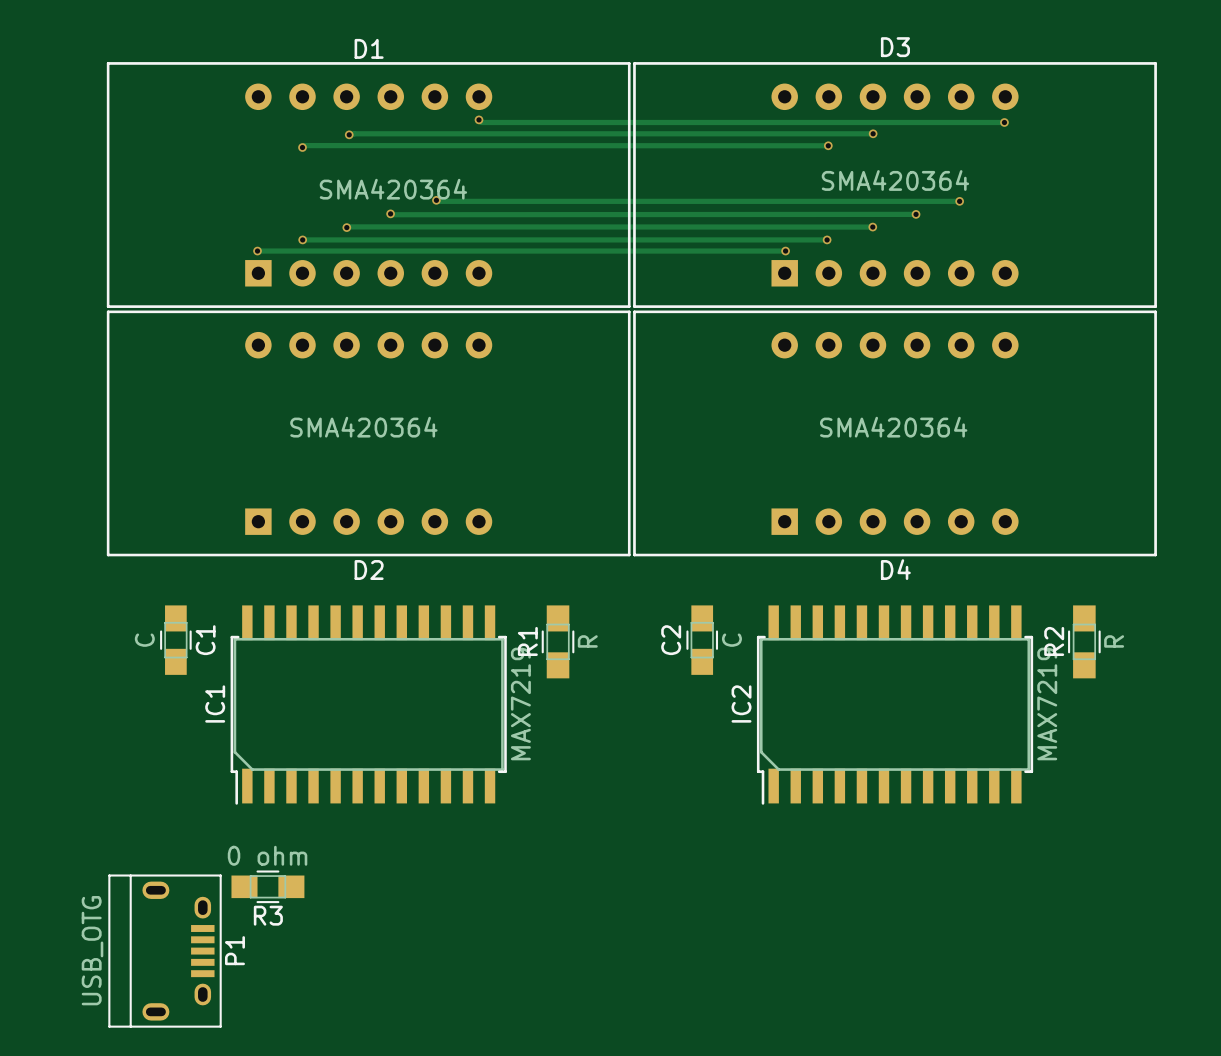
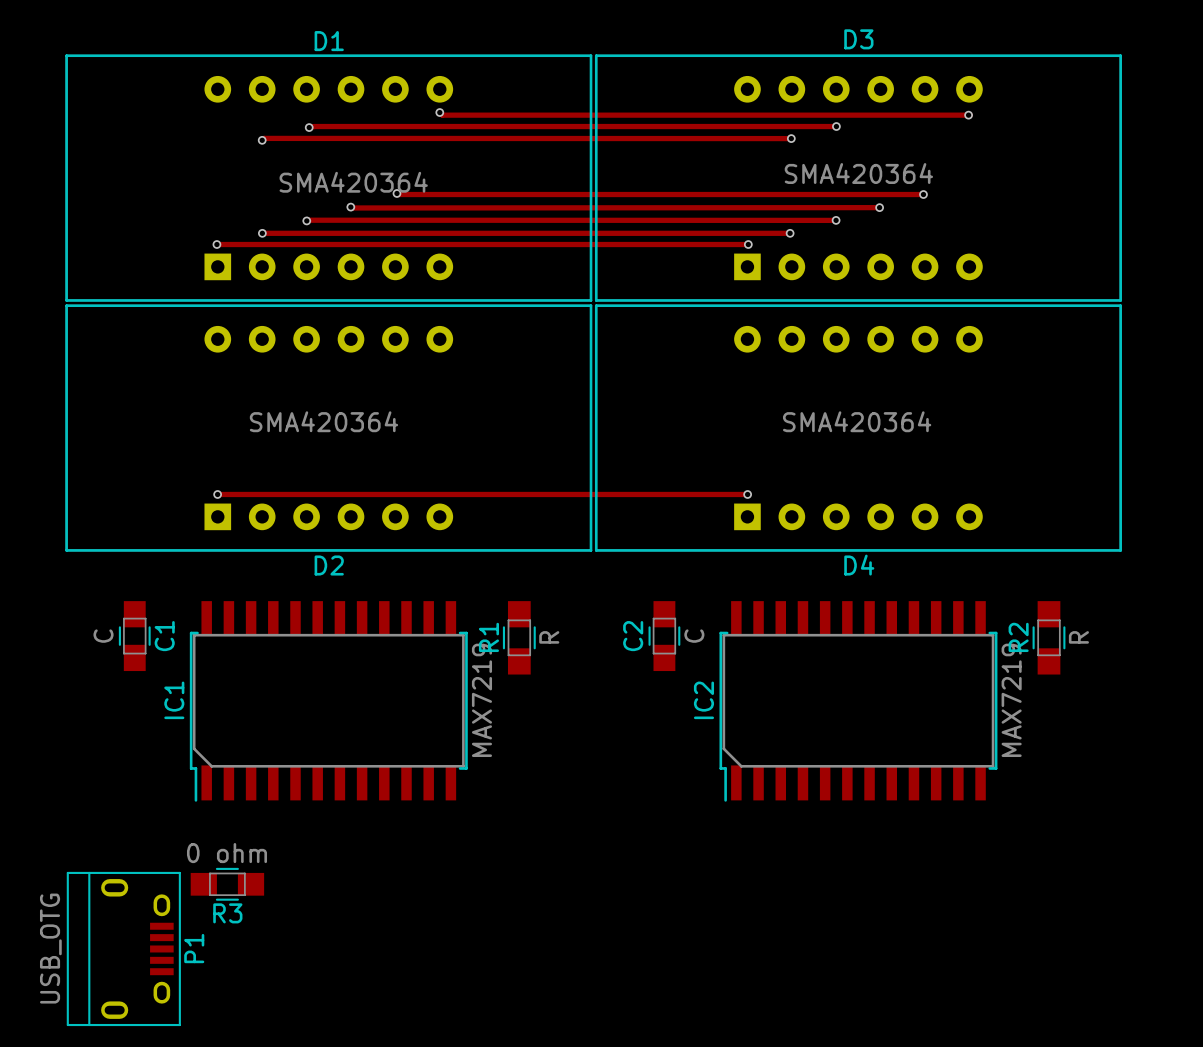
track: none -> (217, 494) (747, 494)
via: none -> (217, 494)
via: none -> (747, 494)

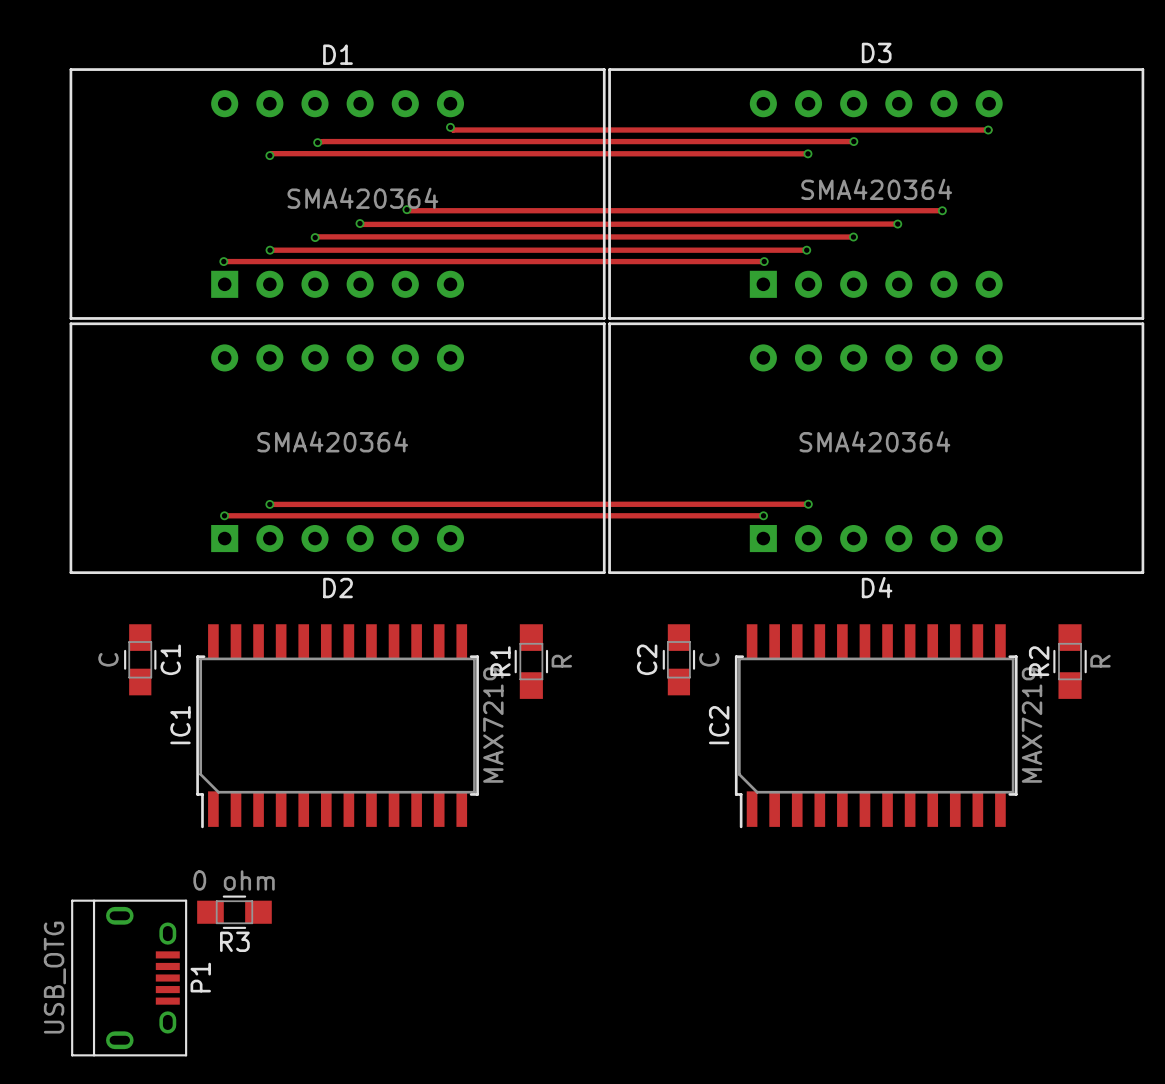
via: none -> (269, 504)
track: none -> (808, 504) (269, 504)
via: none -> (808, 504)

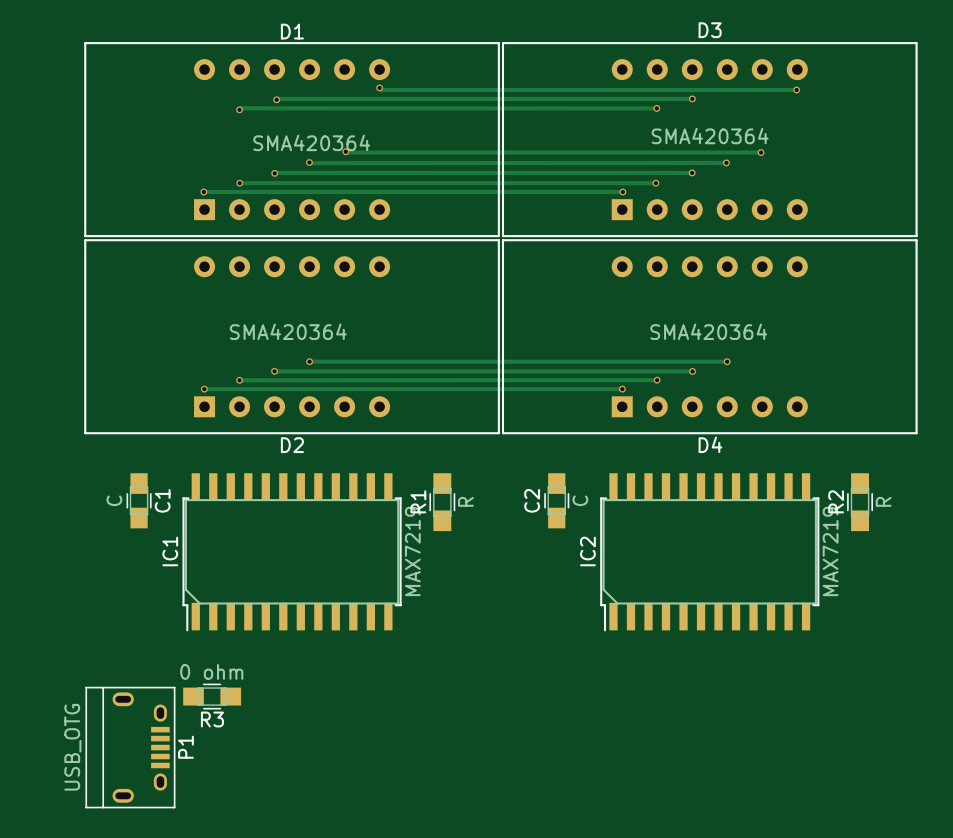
track: none -> (309, 361) (727, 361)
via: none -> (309, 361)
via: none -> (727, 361)
track: none -> (274, 371) (692, 371)
via: none -> (274, 371)
via: none -> (692, 371)

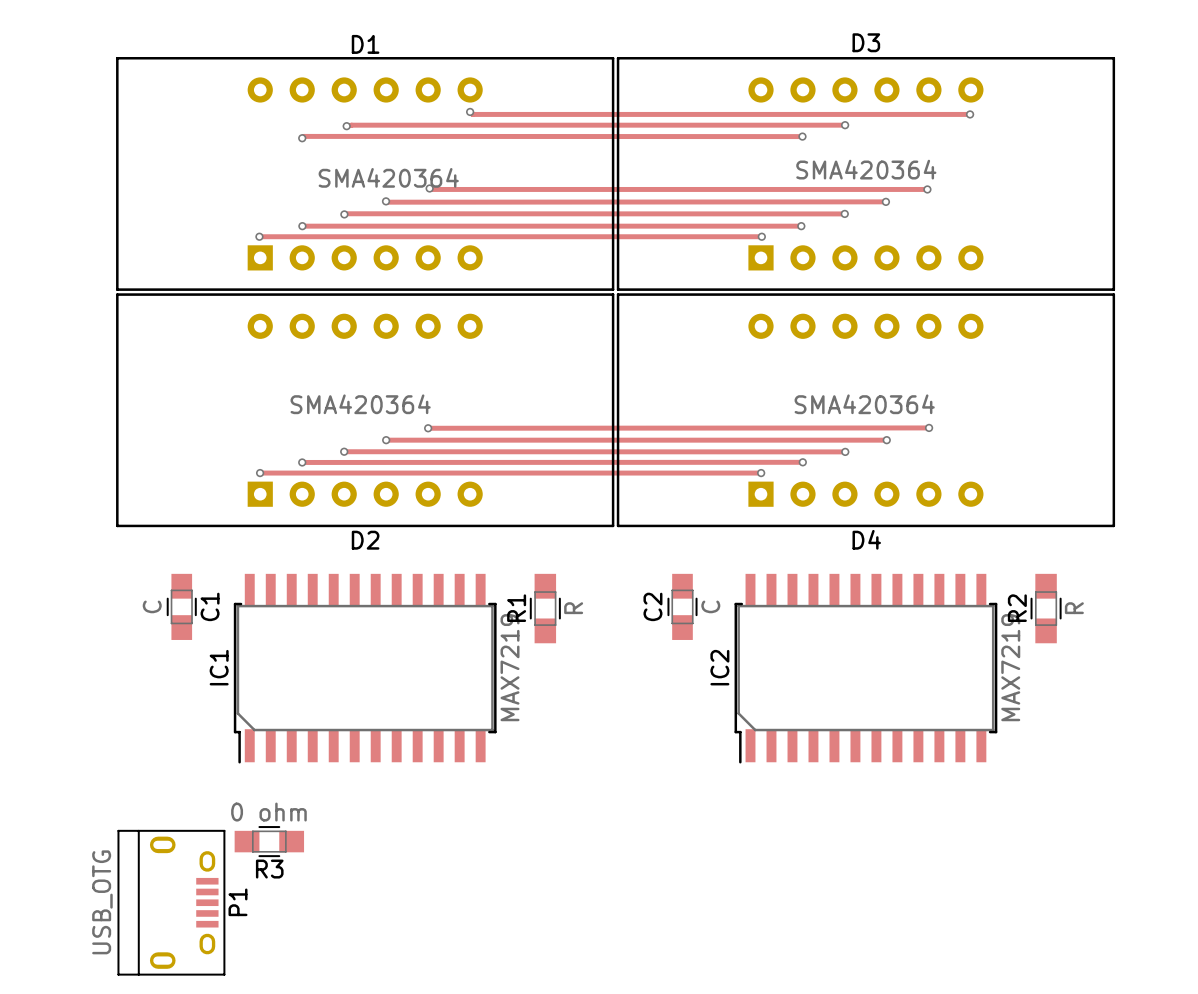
via: none -> (428, 428)
track: none -> (929, 427) (428, 428)
via: none -> (929, 427)

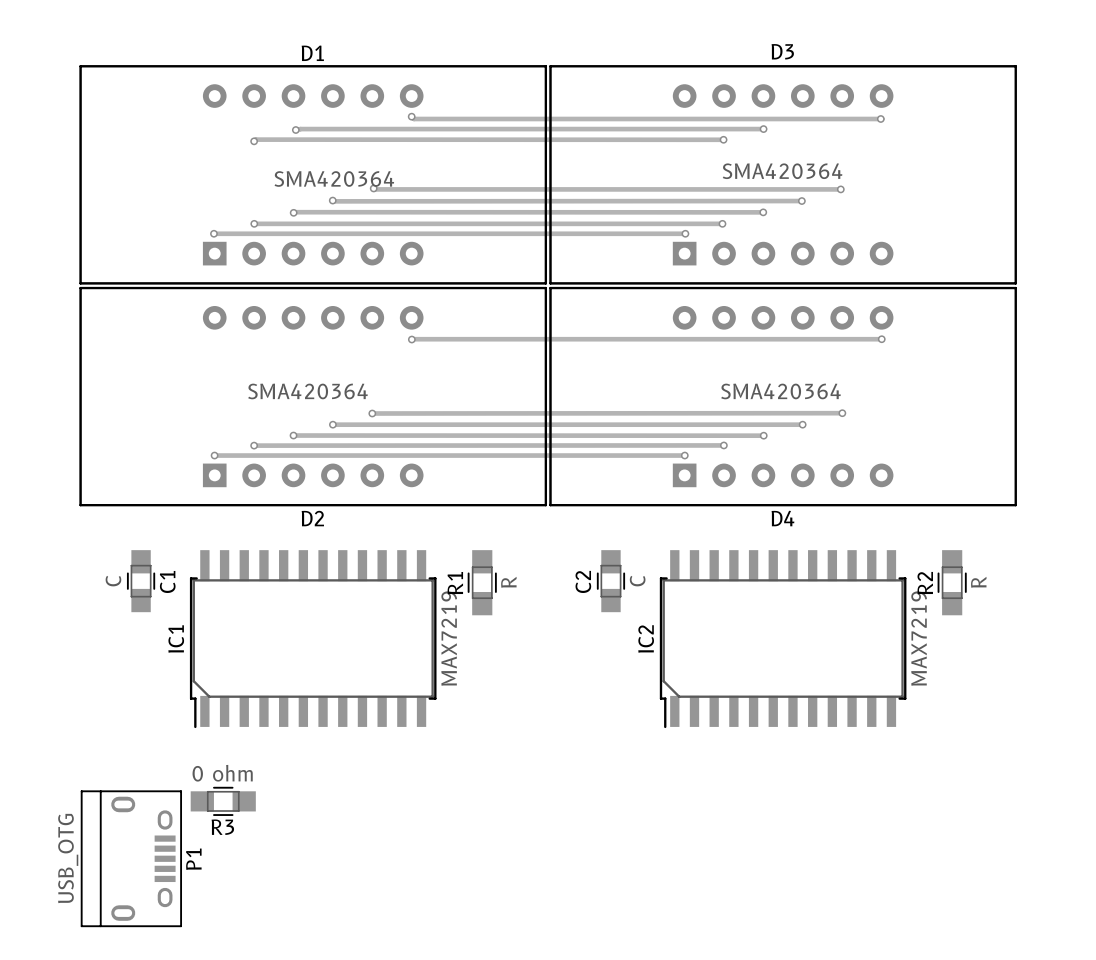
track: none -> (412, 339) (881, 339)
via: none -> (411, 339)
via: none -> (881, 339)

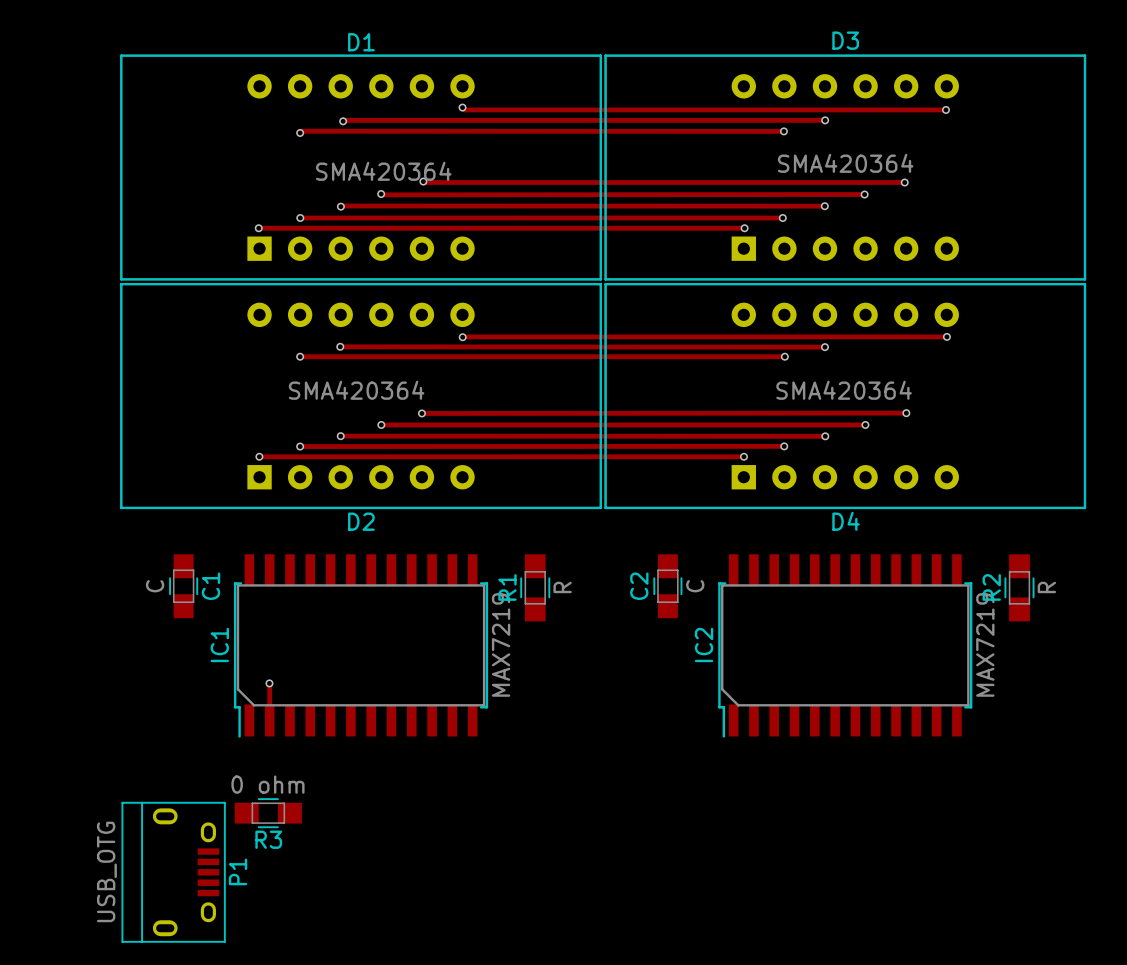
track: none -> (340, 346) (824, 347)
via: none -> (340, 346)
via: none -> (824, 347)
track: none -> (300, 356) (784, 356)
via: none -> (300, 356)
via: none -> (784, 356)
track: none -> (269, 683) (269, 720)
via: none -> (269, 683)

